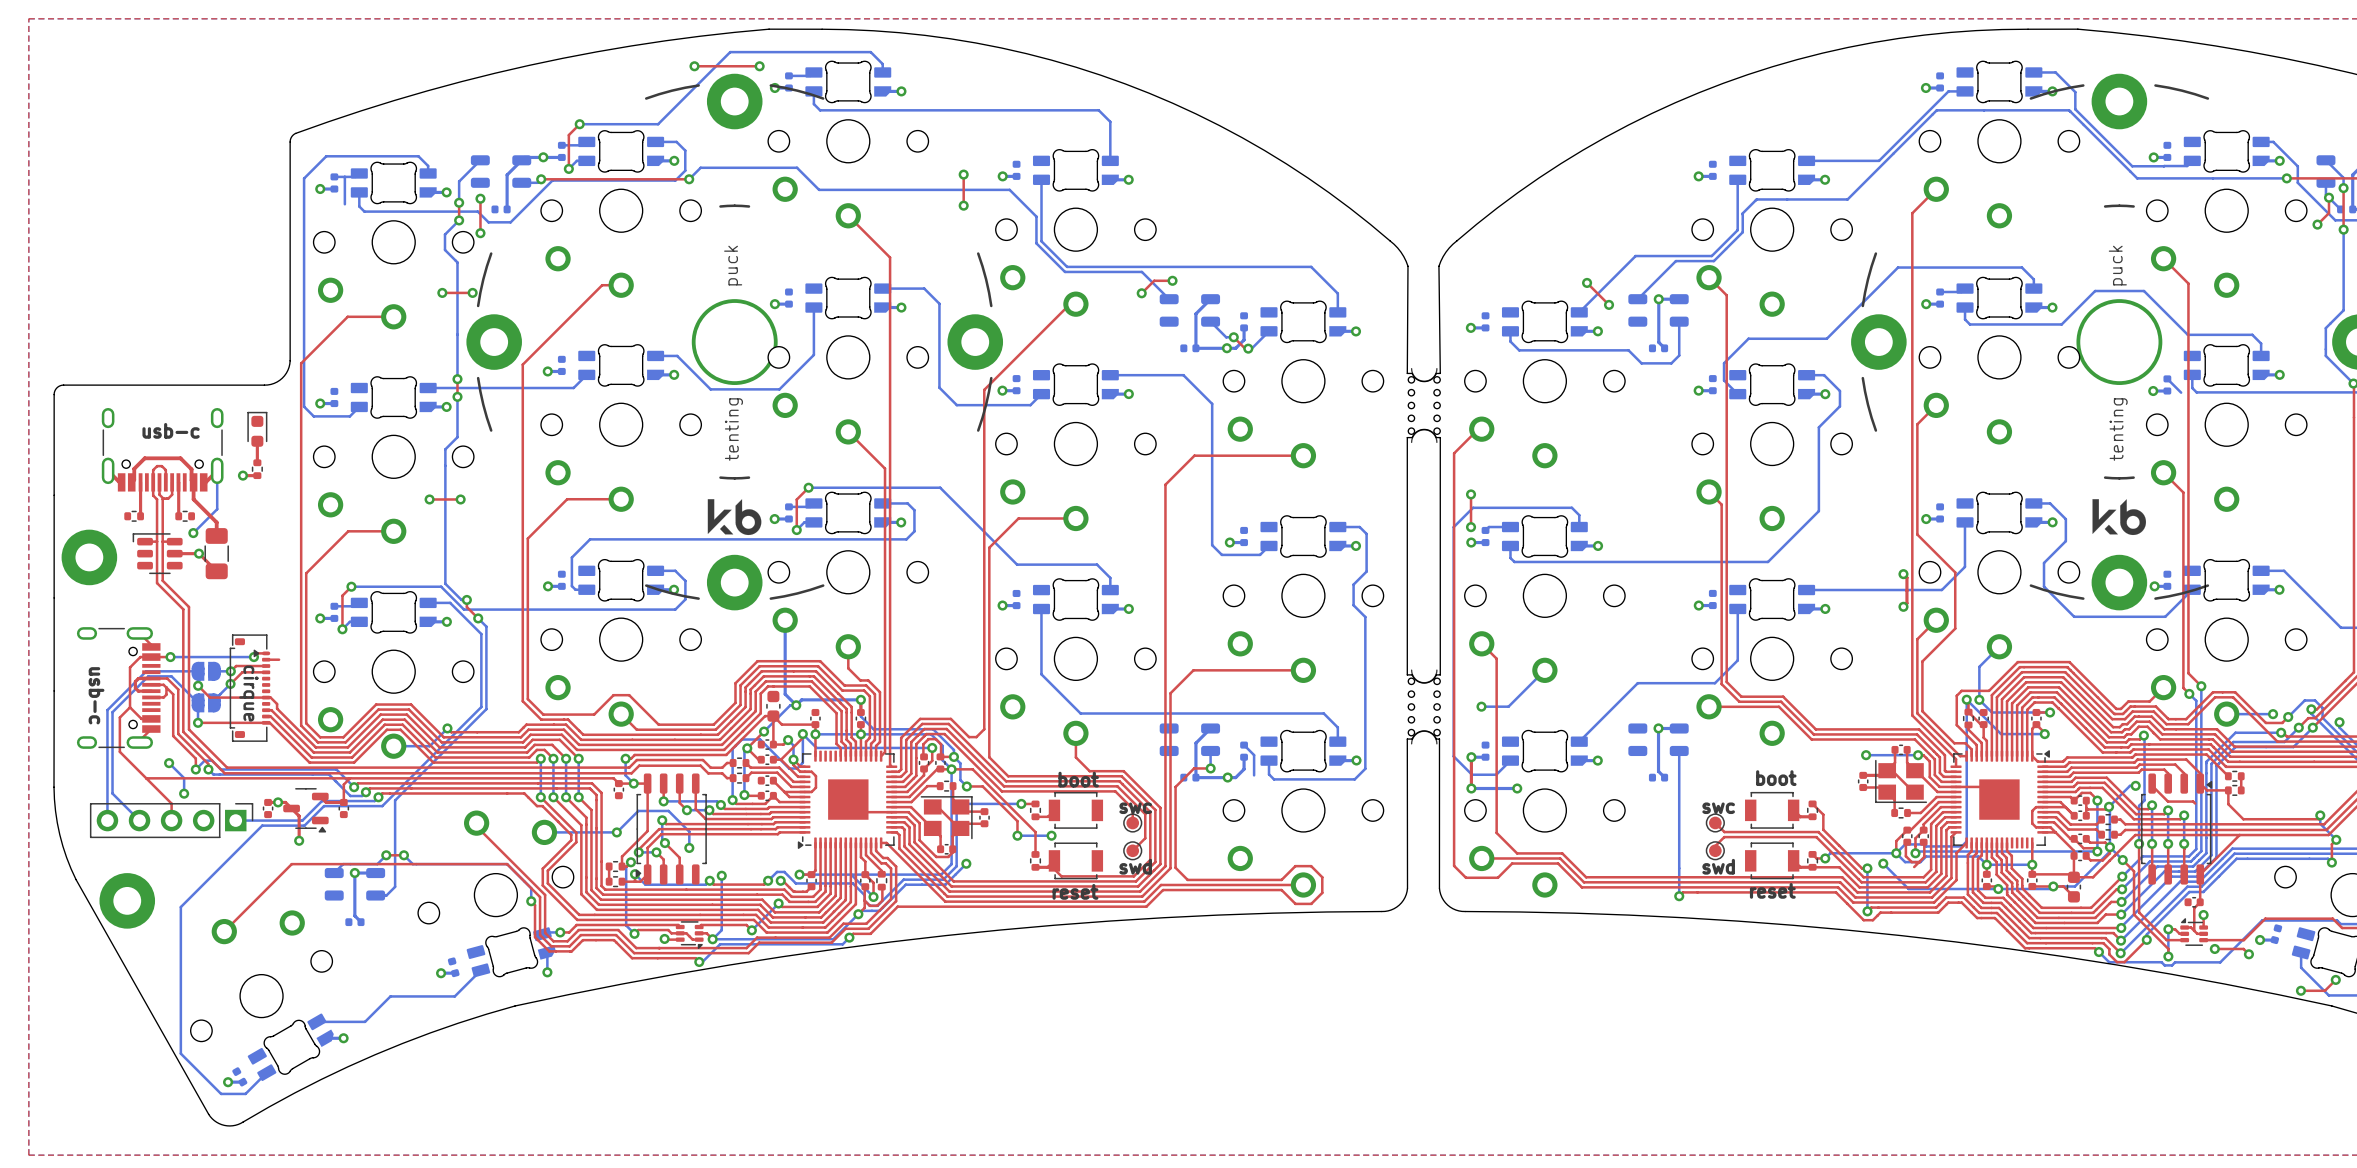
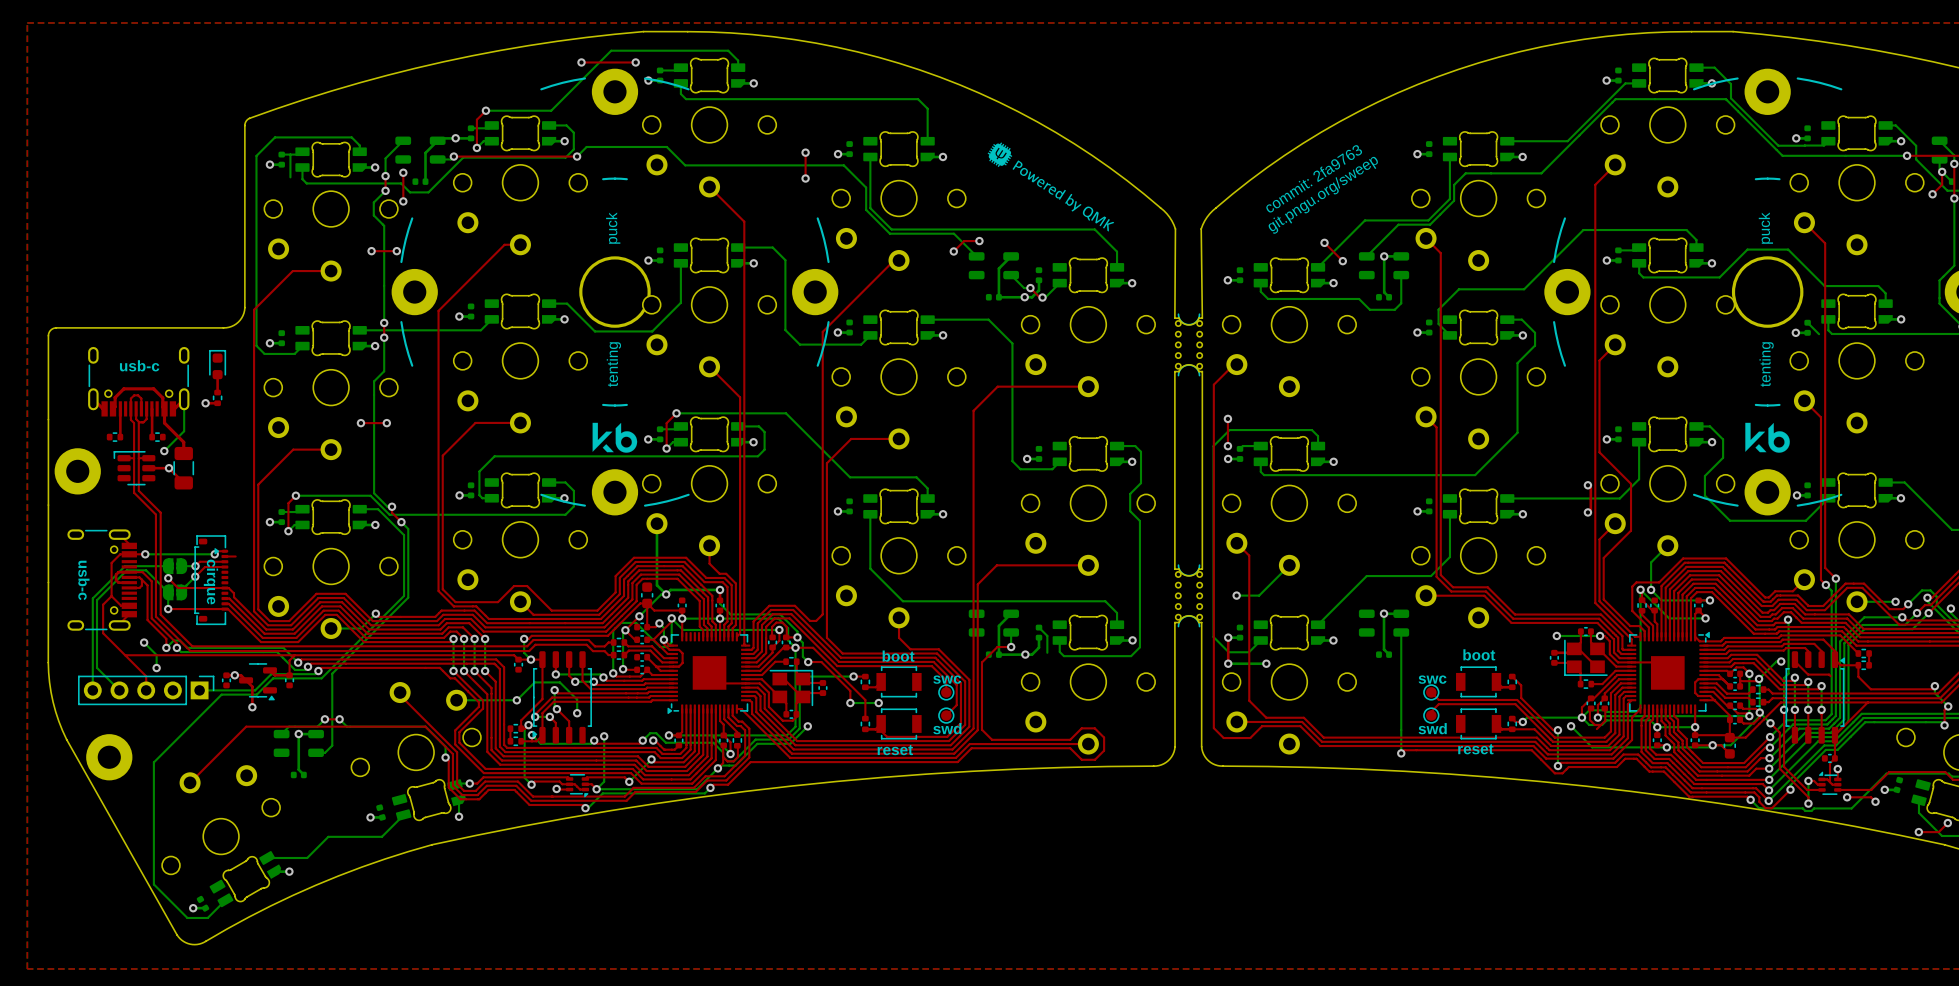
drawing: none -> [987, 142, 1115, 232]
text: none -> commit: 2fa9763 (1314, 178)
text: none -> git.pngu.org/sweep (1323, 195)

